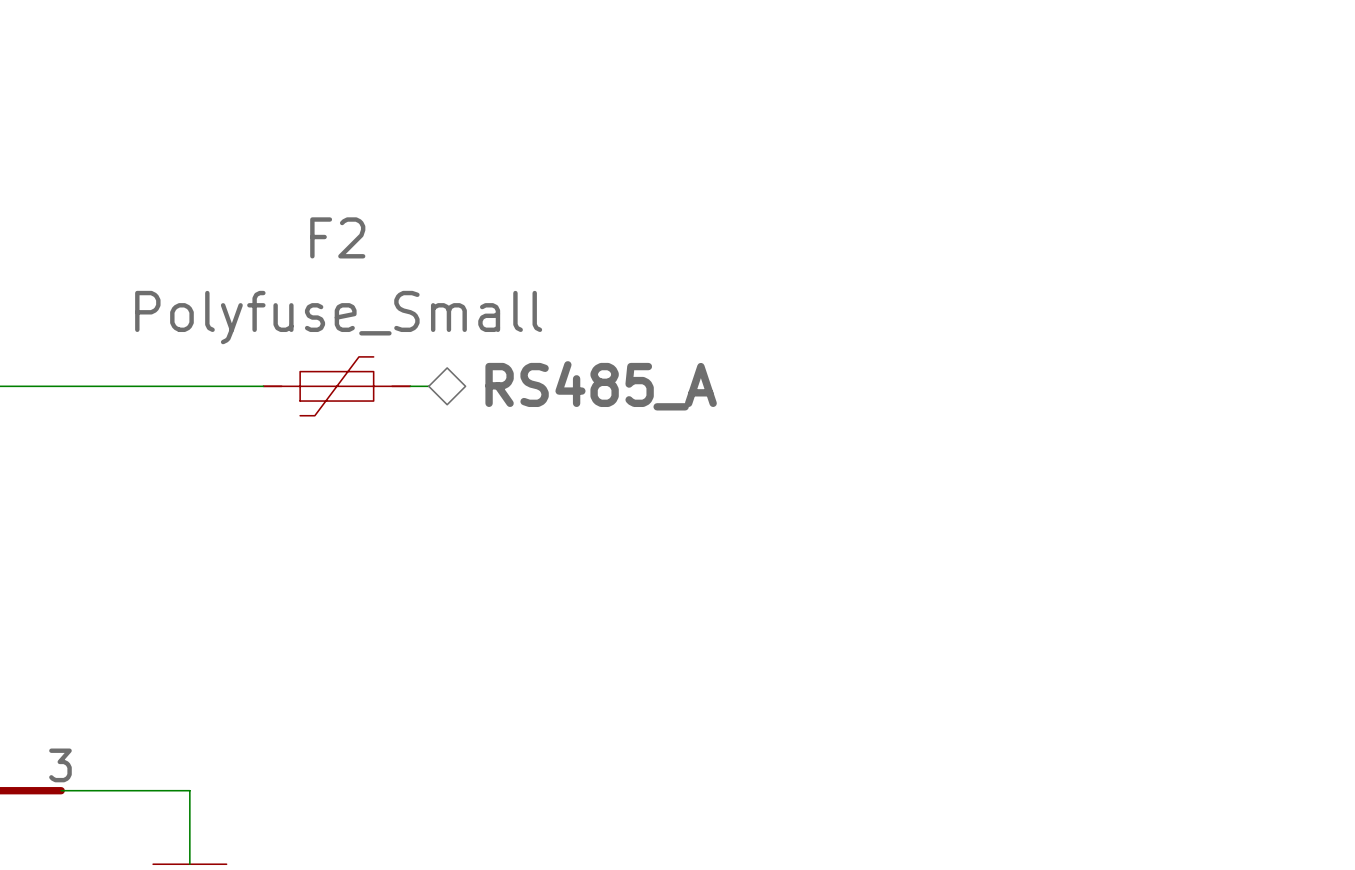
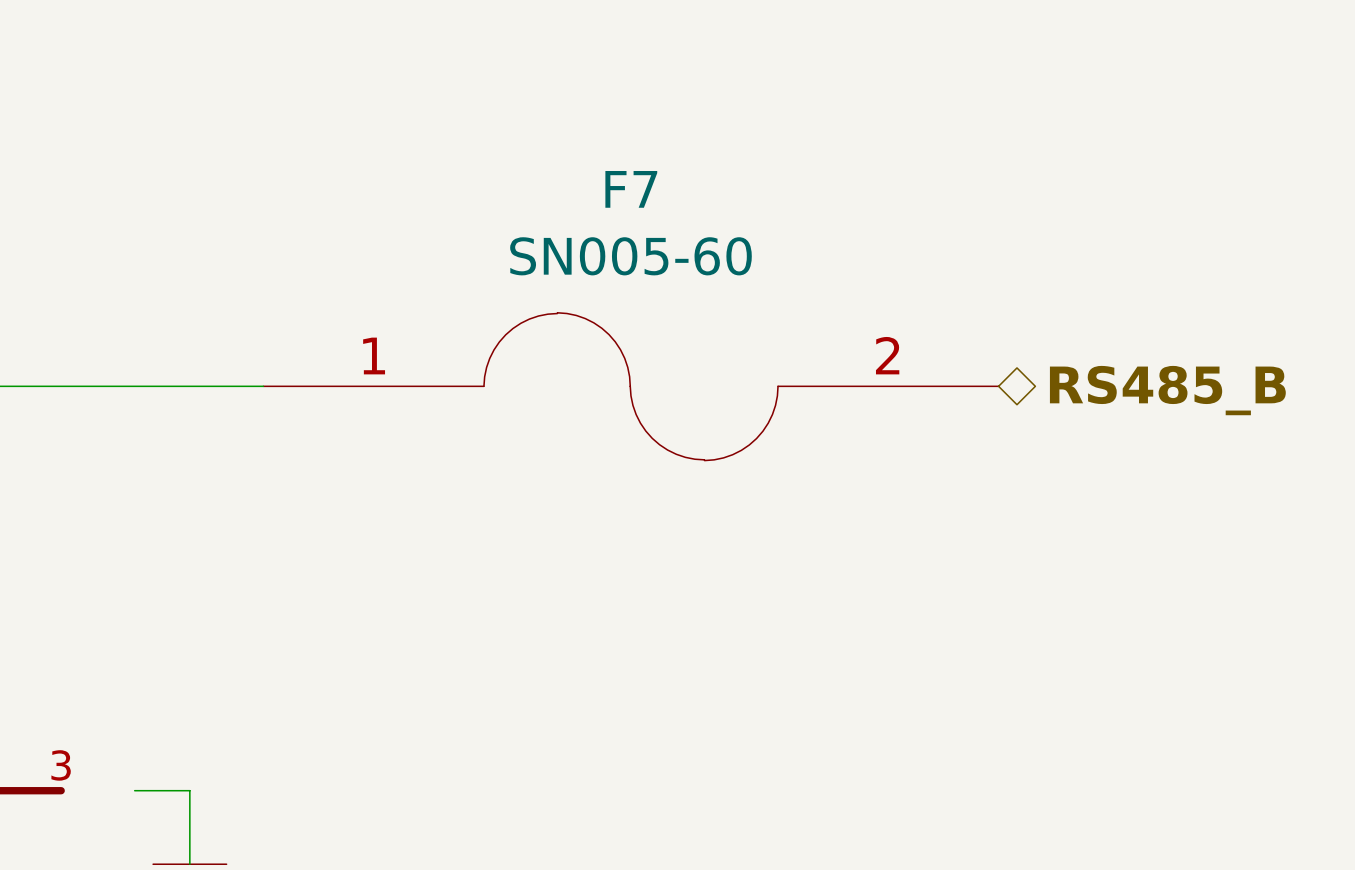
hierarchical label: RS485_A (601, 385) -> none
hierarchical label: none -> RS485_B (1167, 390)
F2: Polyfuse_Small (336, 386) -> none
F7: none -> SN005-60 (630, 386)
wire: (61, 790) (134, 790) -> none

